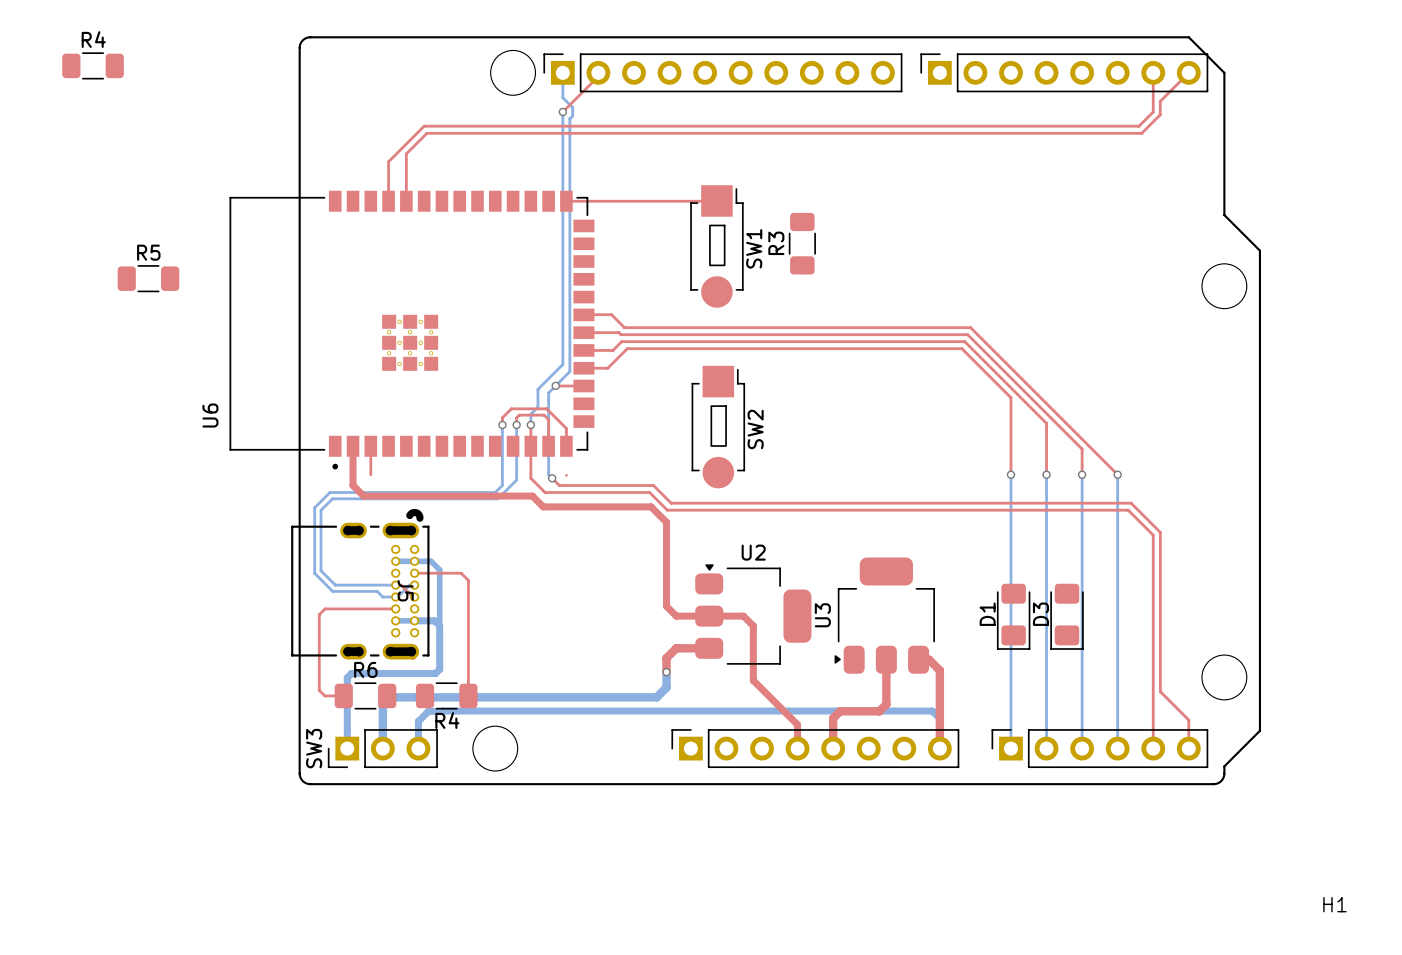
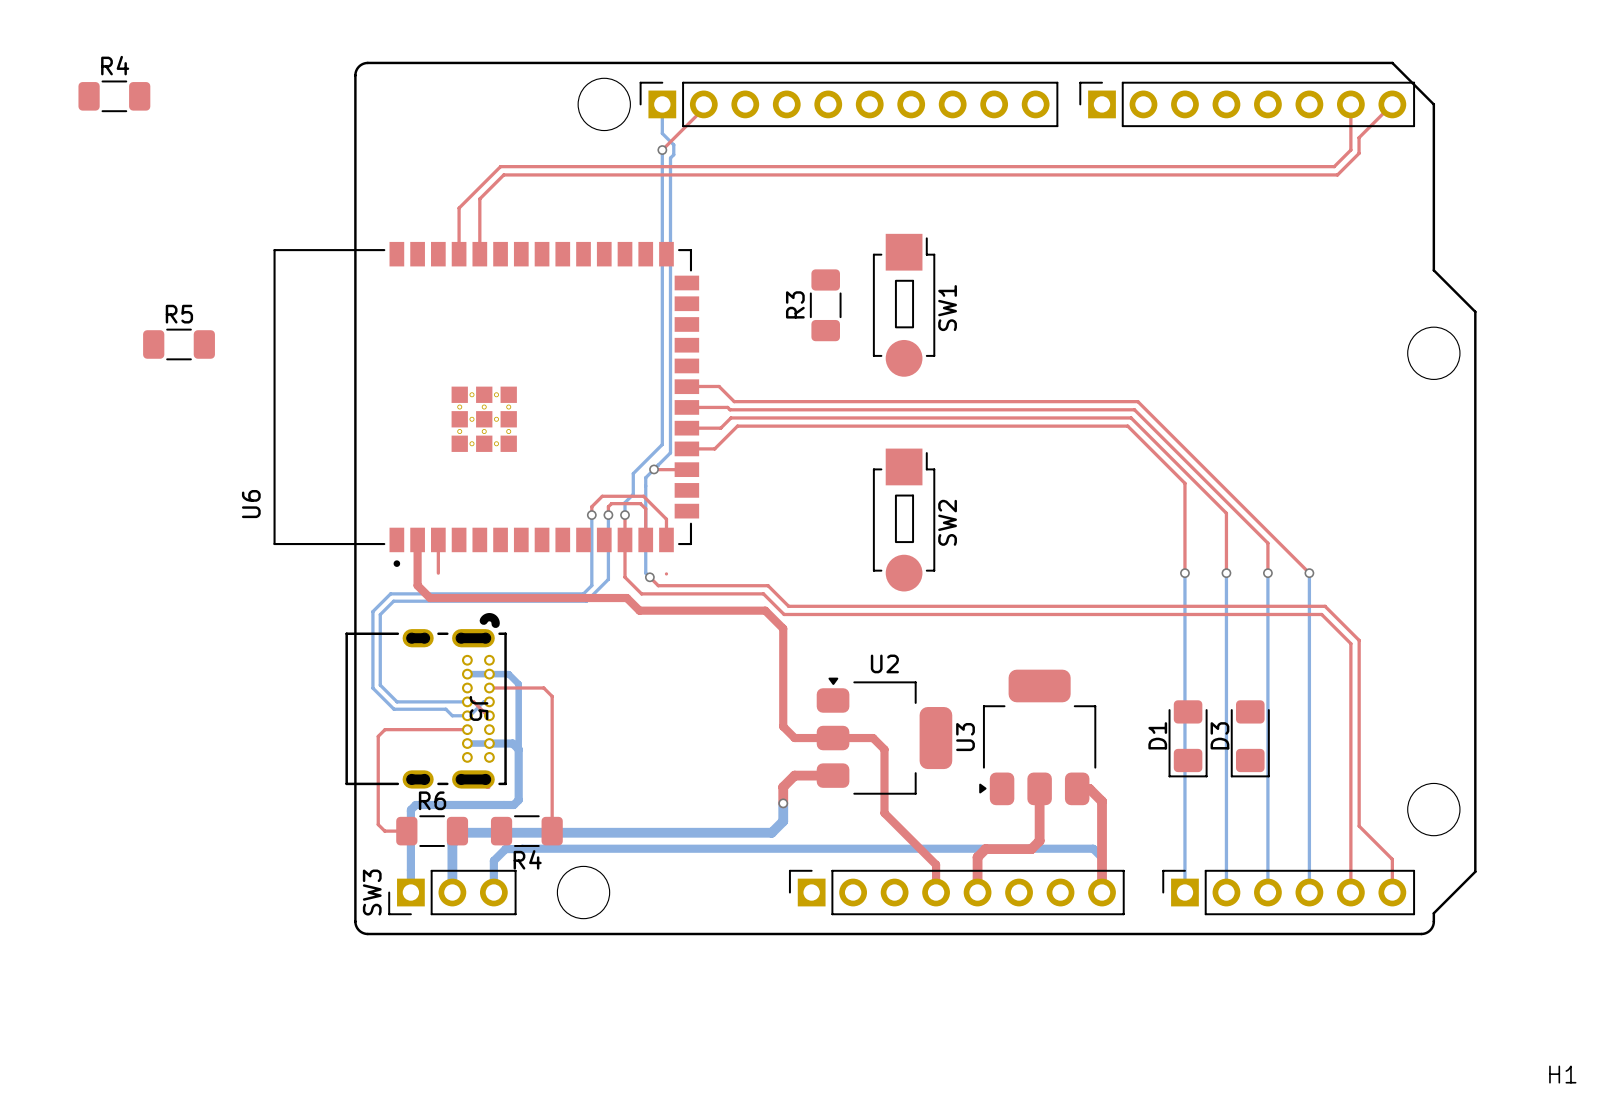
top track: (716, 200) (566, 201) -> none
R3 position: (802, 243) -> (825, 305)
SW1 position: (716, 246) -> (904, 305)
SW2 position: (718, 427) -> (904, 520)

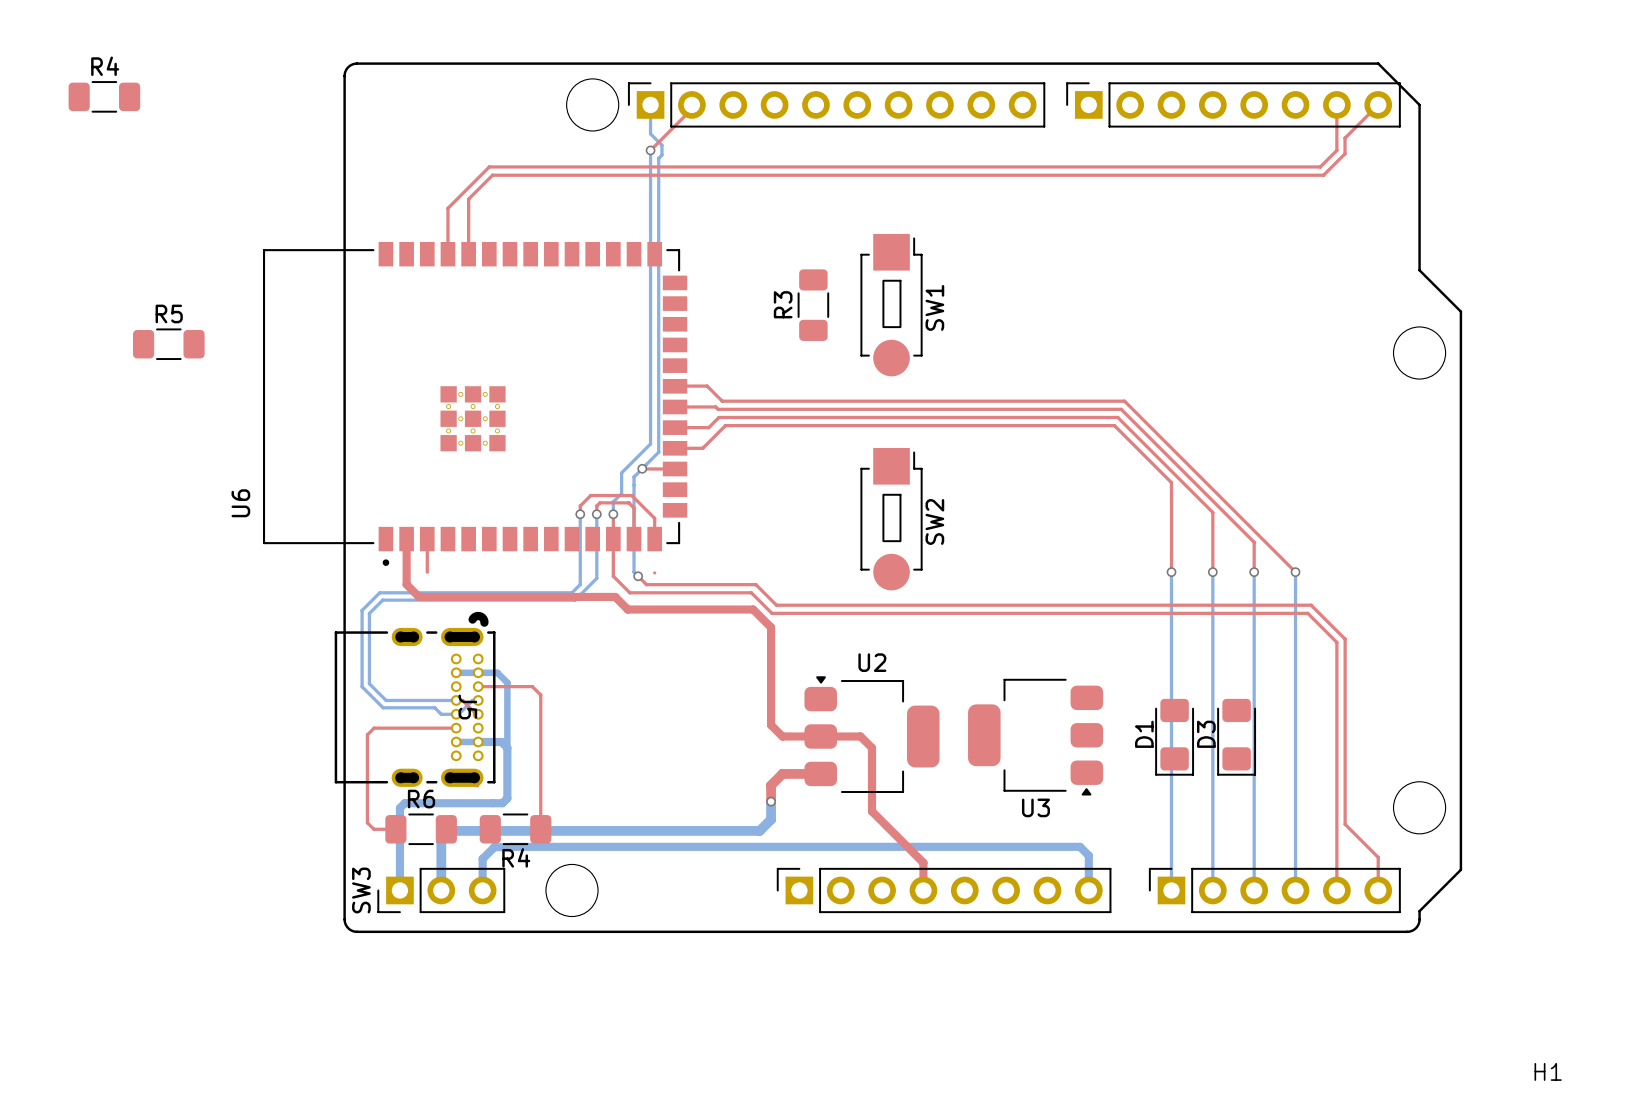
U3 rotation: 0° (1037, 737) -> 90° counterclockwise (1035, 737)
top track: (1039, 788) (1039, 840) (1031, 849) (985, 849) (977, 857) (977, 892) -> none
top track: (1077, 788) (1089, 788) (1102, 801) (1102, 892) -> none

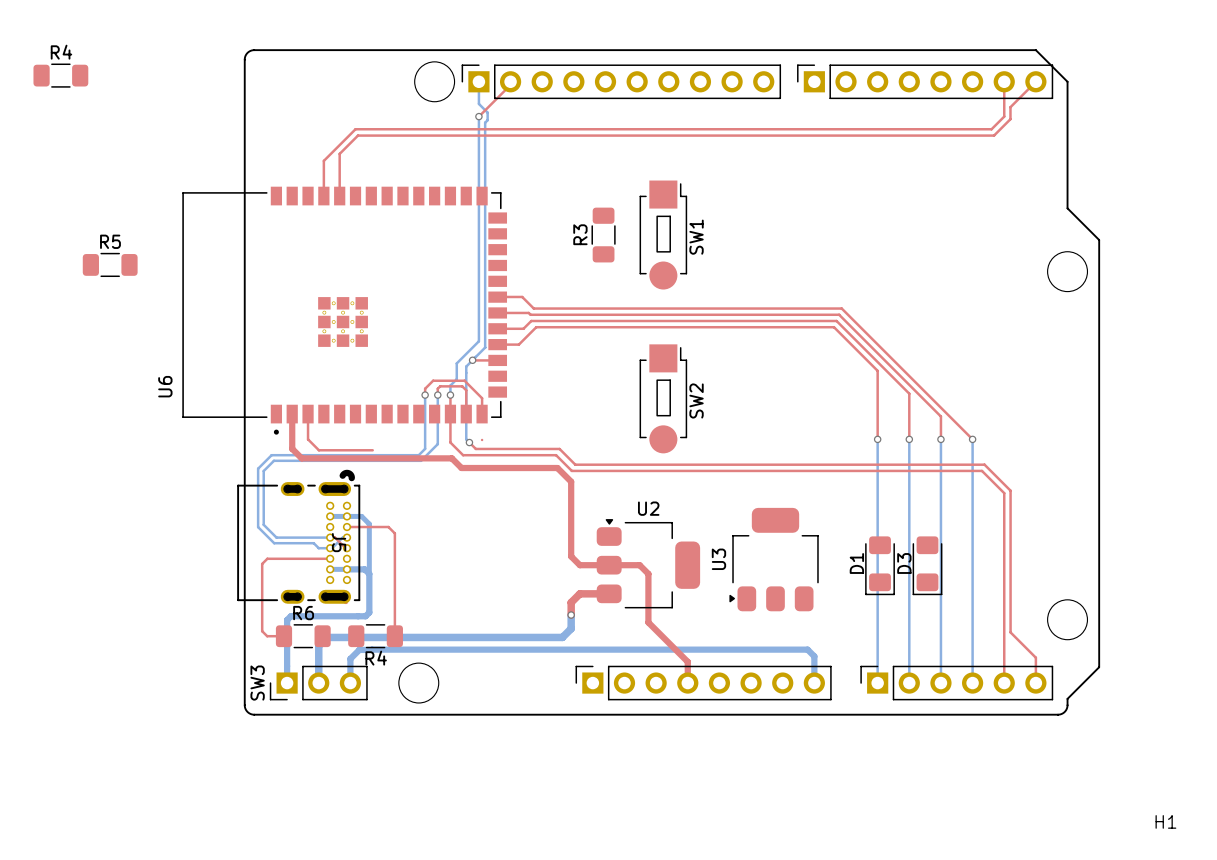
top track: none -> (308, 439) (318, 450) (372, 450)
U3 rotation: 0° (1035, 737) -> 90° clockwise (774, 559)

